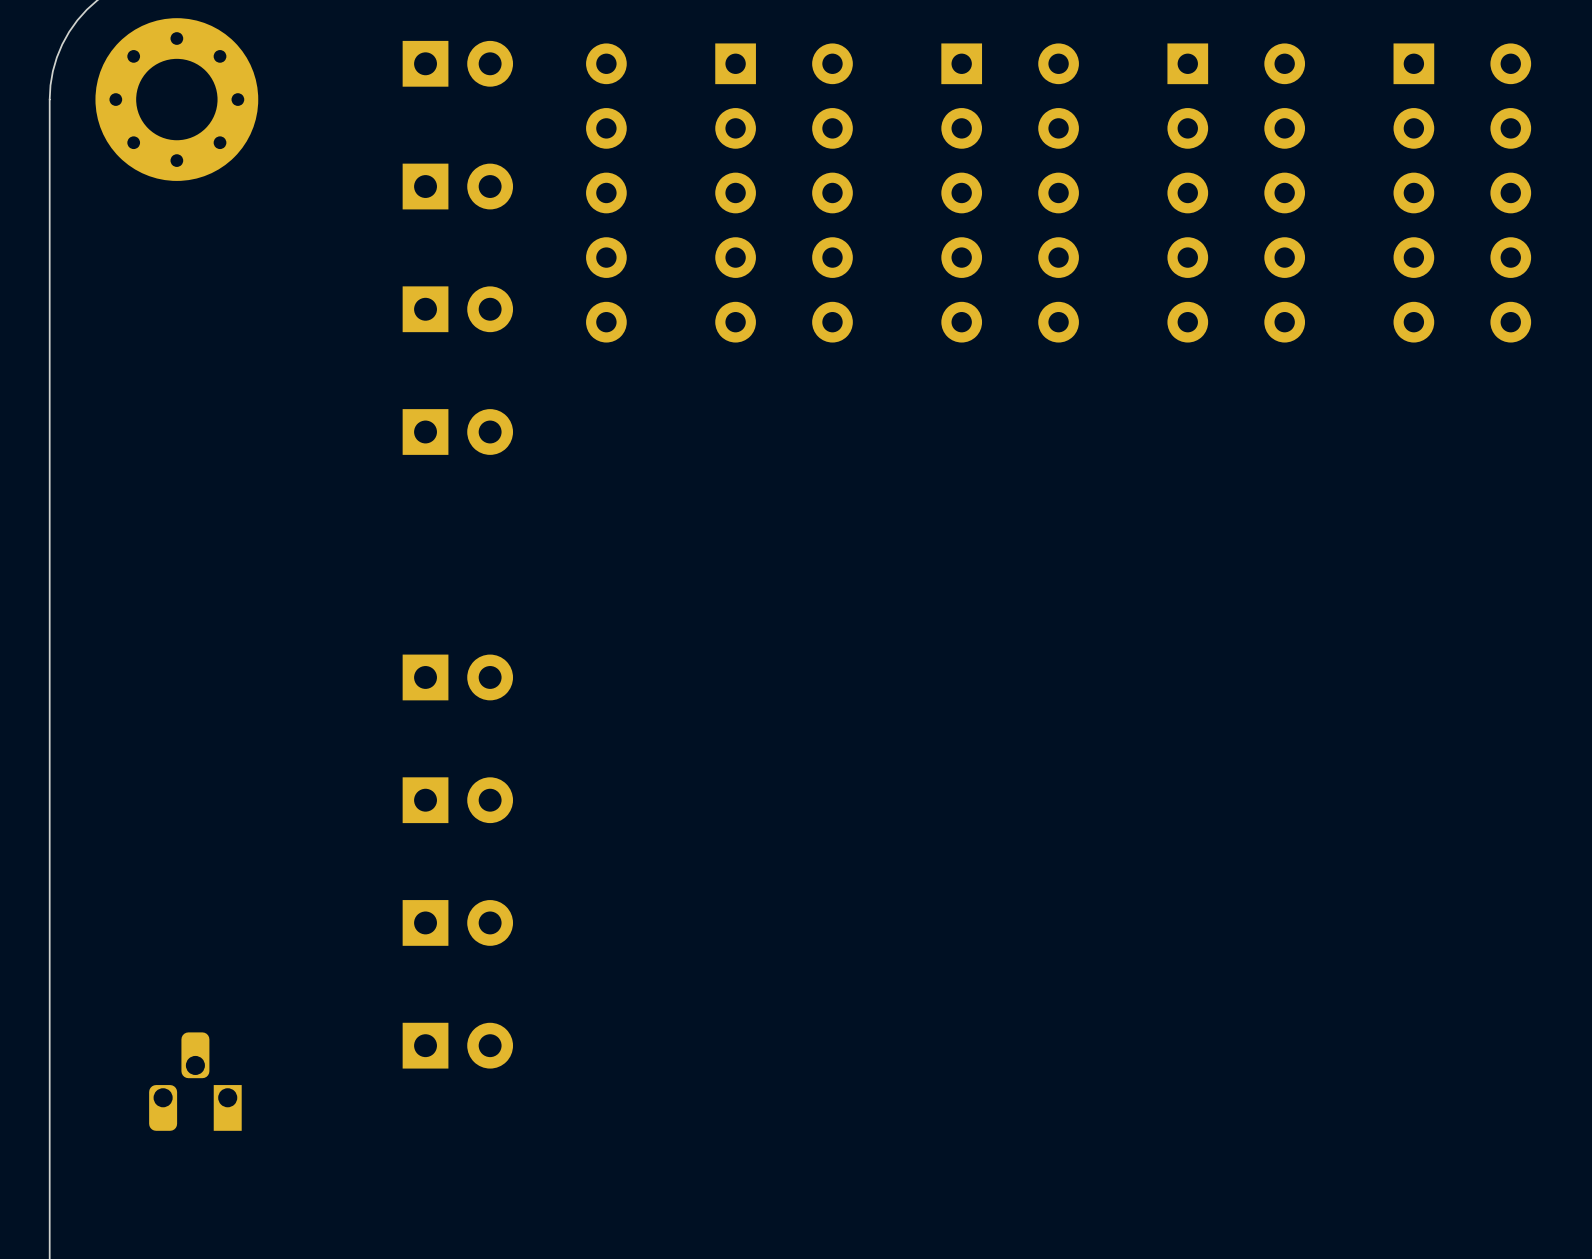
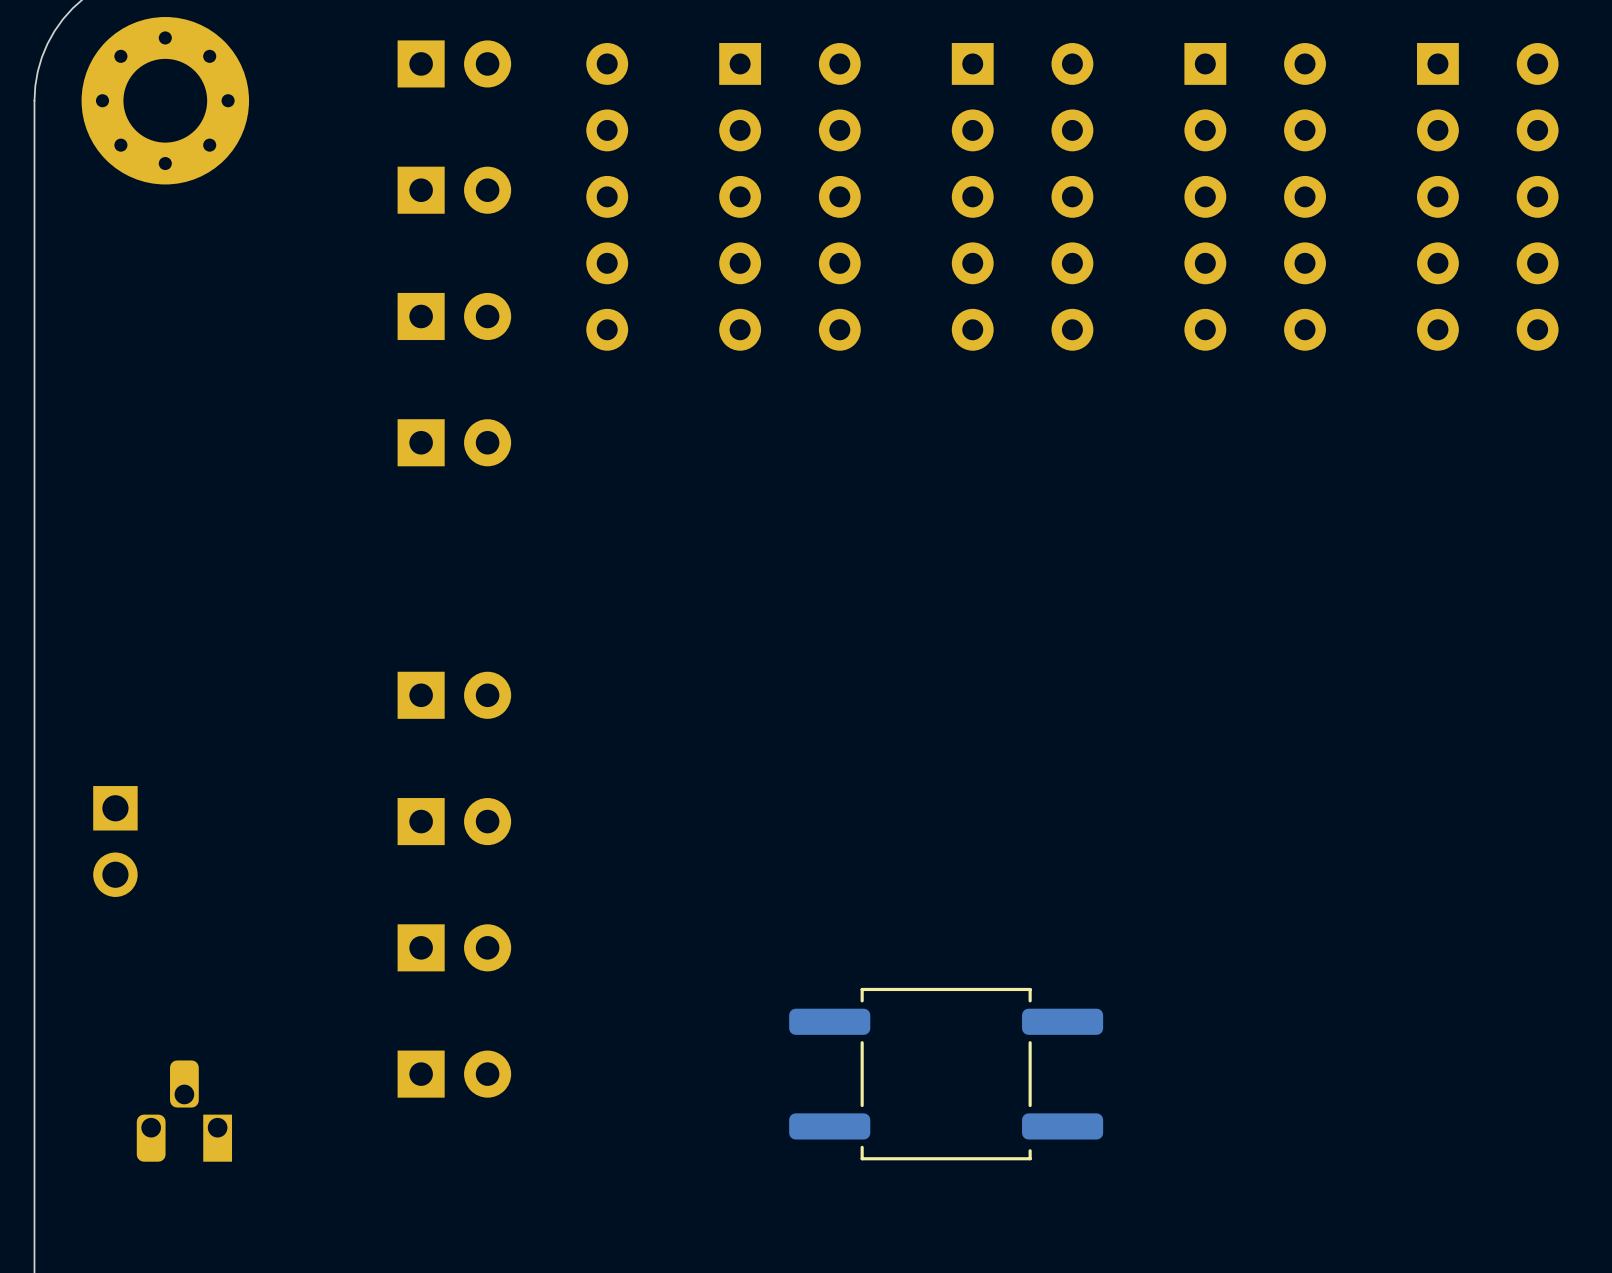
part: none -> (115, 841)
part: none -> (946, 1074)

